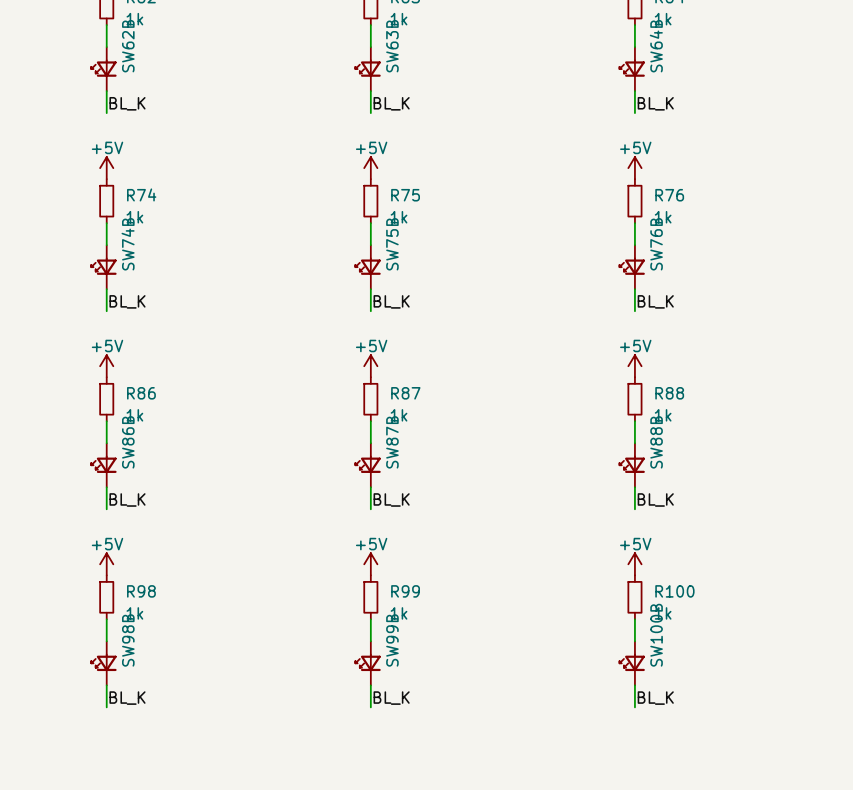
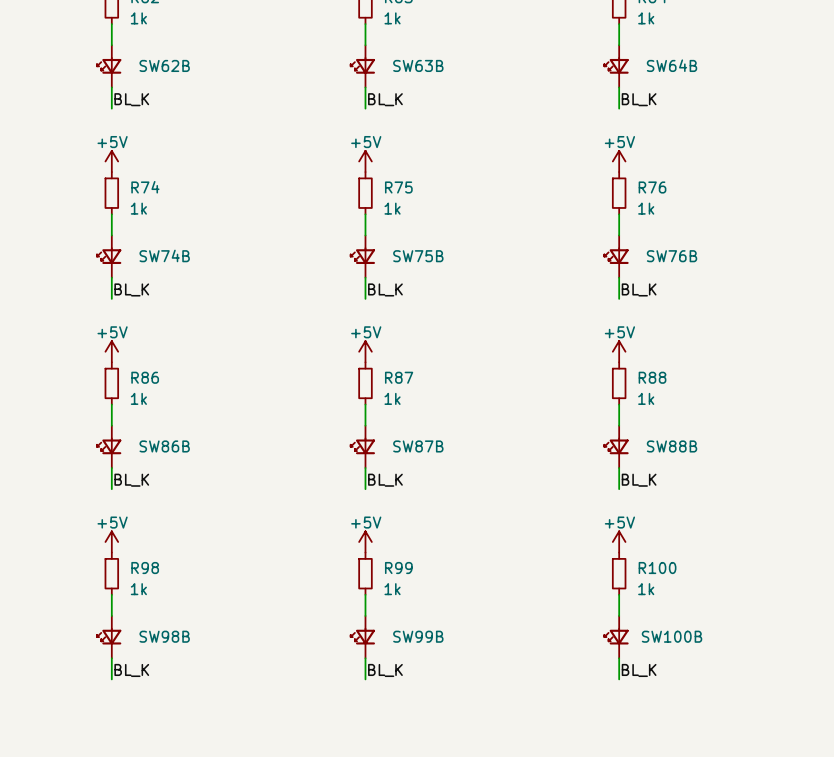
SW62B name rotation: 0° (128, 46) -> 90° clockwise (164, 65)
SW63B name rotation: 0° (392, 46) -> 90° clockwise (418, 65)
SW64B name rotation: 0° (656, 46) -> 90° clockwise (672, 65)
SW74B name rotation: 0° (128, 244) -> 90° clockwise (164, 255)
SW75B name rotation: 0° (392, 244) -> 90° clockwise (418, 256)
SW76B name rotation: 0° (656, 244) -> 90° clockwise (672, 256)
SW86B name rotation: 0° (128, 442) -> 90° clockwise (164, 446)
SW87B name rotation: 0° (392, 442) -> 90° clockwise (418, 446)
SW88B name rotation: 0° (656, 442) -> 90° clockwise (672, 446)
SW100B name rotation: 0° (656, 635) -> 90° clockwise (672, 636)
SW98B name rotation: 0° (128, 640) -> 90° clockwise (164, 636)
SW99B name rotation: 0° (392, 640) -> 90° clockwise (418, 636)

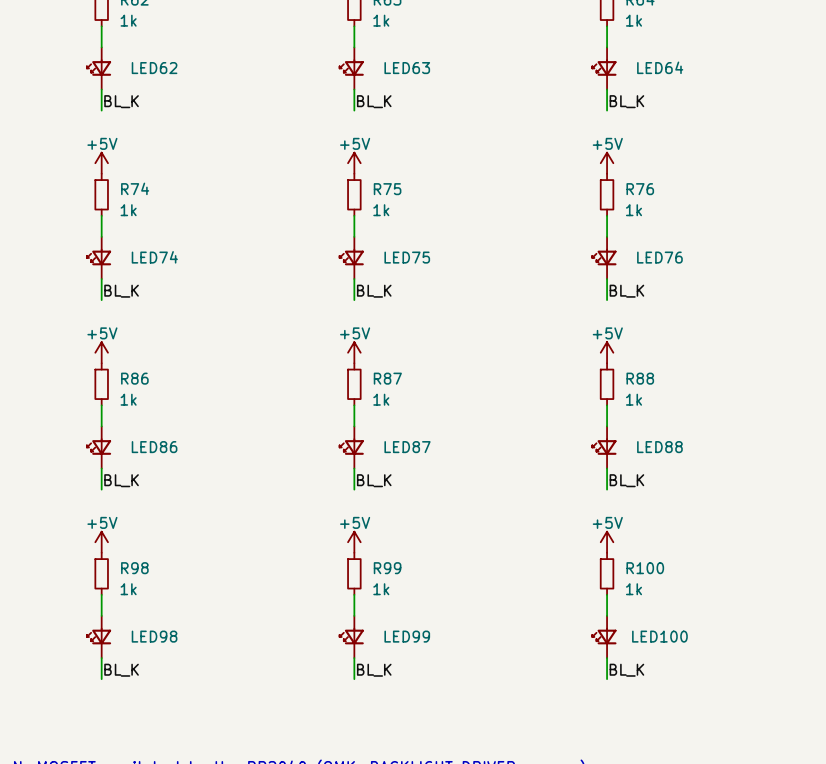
SW62B name: SW62B (164, 65) -> LED62 (154, 68)
SW63B name: SW63B (418, 65) -> LED63 (407, 68)
SW64B name: SW64B (672, 65) -> LED64 (660, 67)
SW74B name: SW74B (164, 255) -> LED74 (154, 257)
SW75B name: SW75B (418, 256) -> LED75 (407, 257)
SW76B name: SW76B (672, 256) -> LED76 (659, 257)
SW86B name: SW86B (164, 446) -> LED86 (154, 447)
SW87B name: SW87B (418, 446) -> LED87 (407, 447)
SW88B name: SW88B (672, 446) -> LED88 (659, 447)
SW98B name: SW98B (164, 636) -> LED98 (154, 636)
SW99B name: SW99B (418, 636) -> LED99 (407, 636)
SW100B name: SW100B (672, 636) -> LED100 (659, 636)

